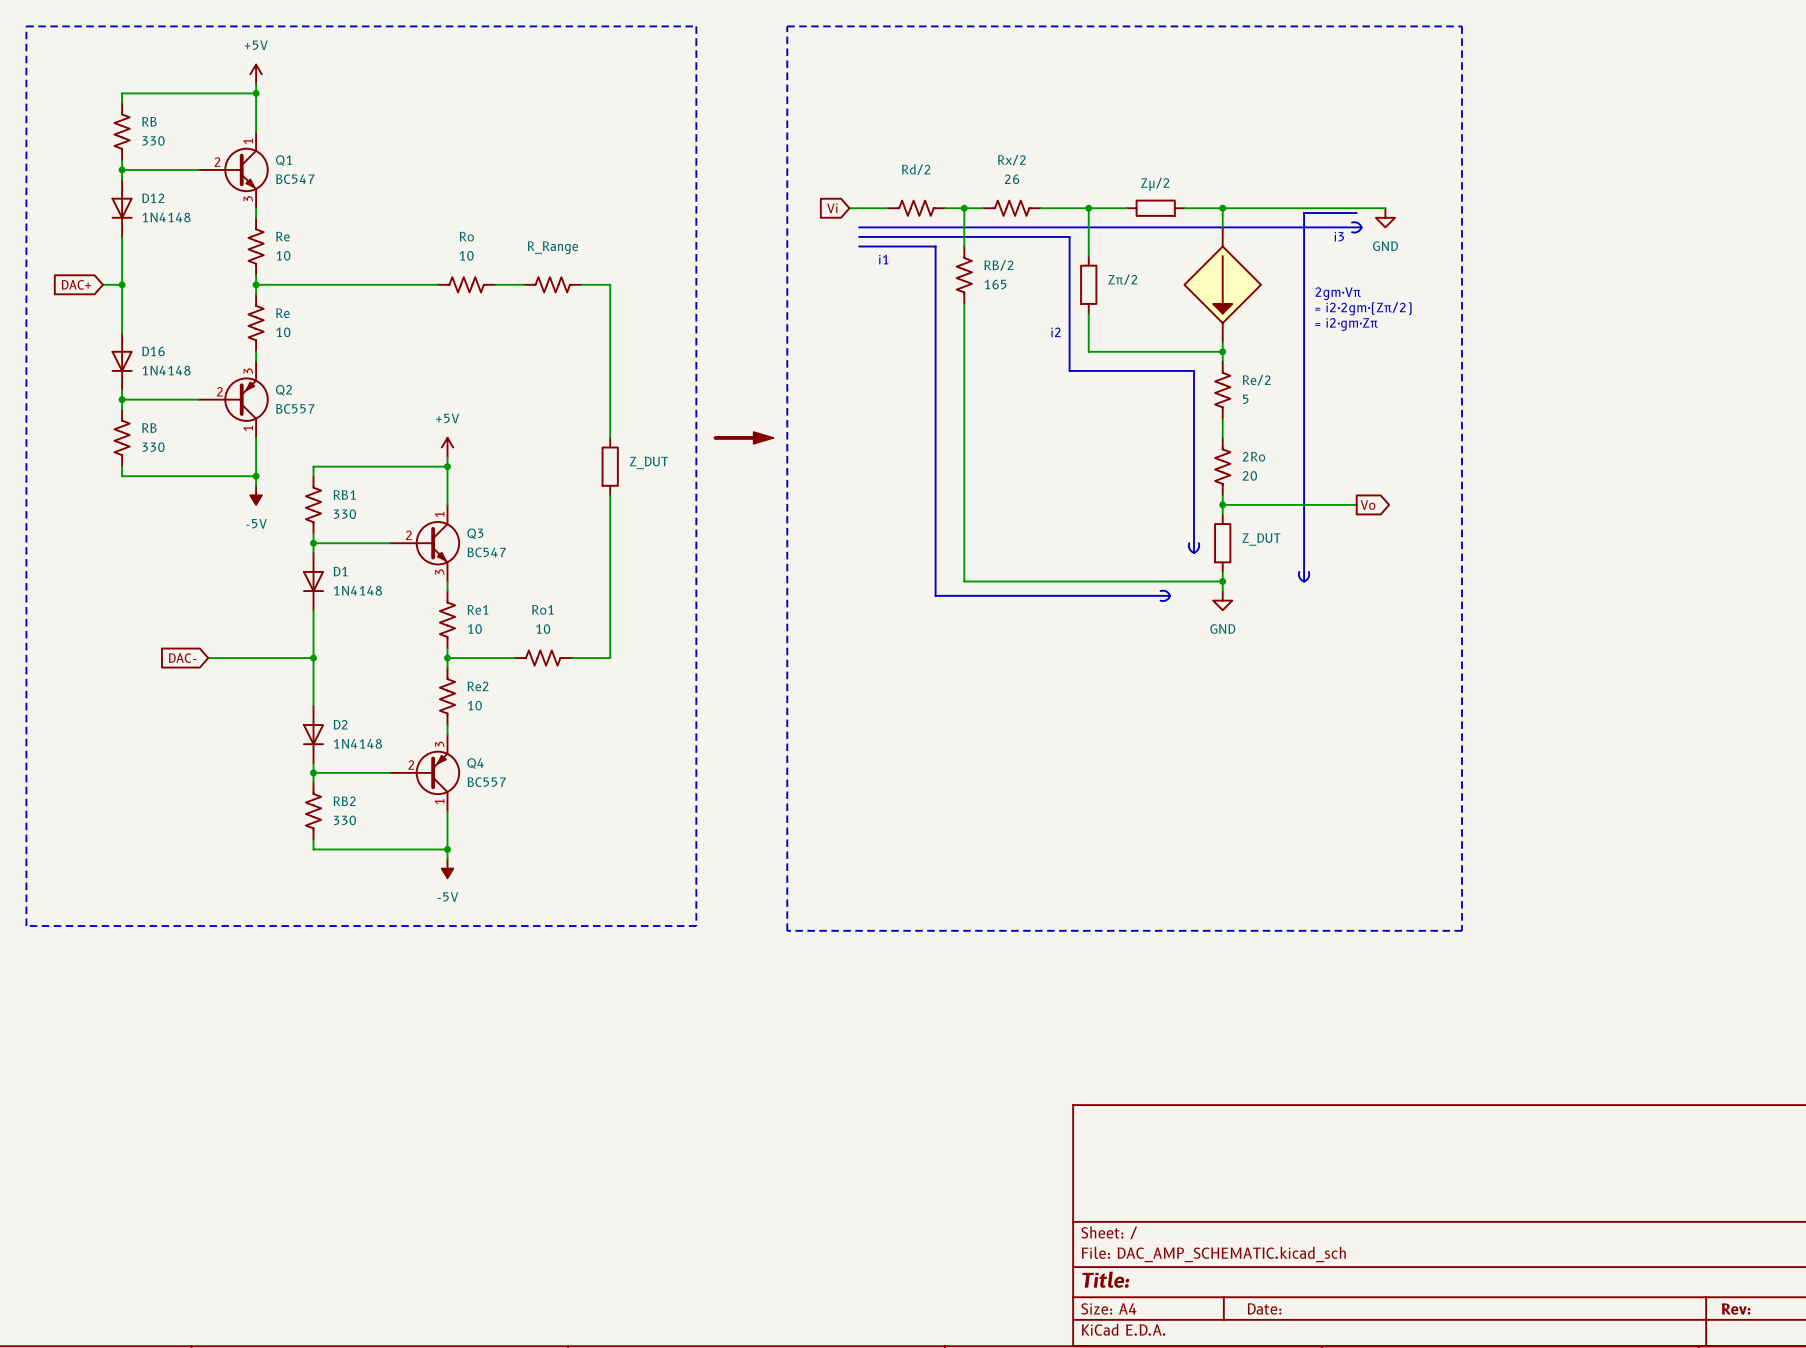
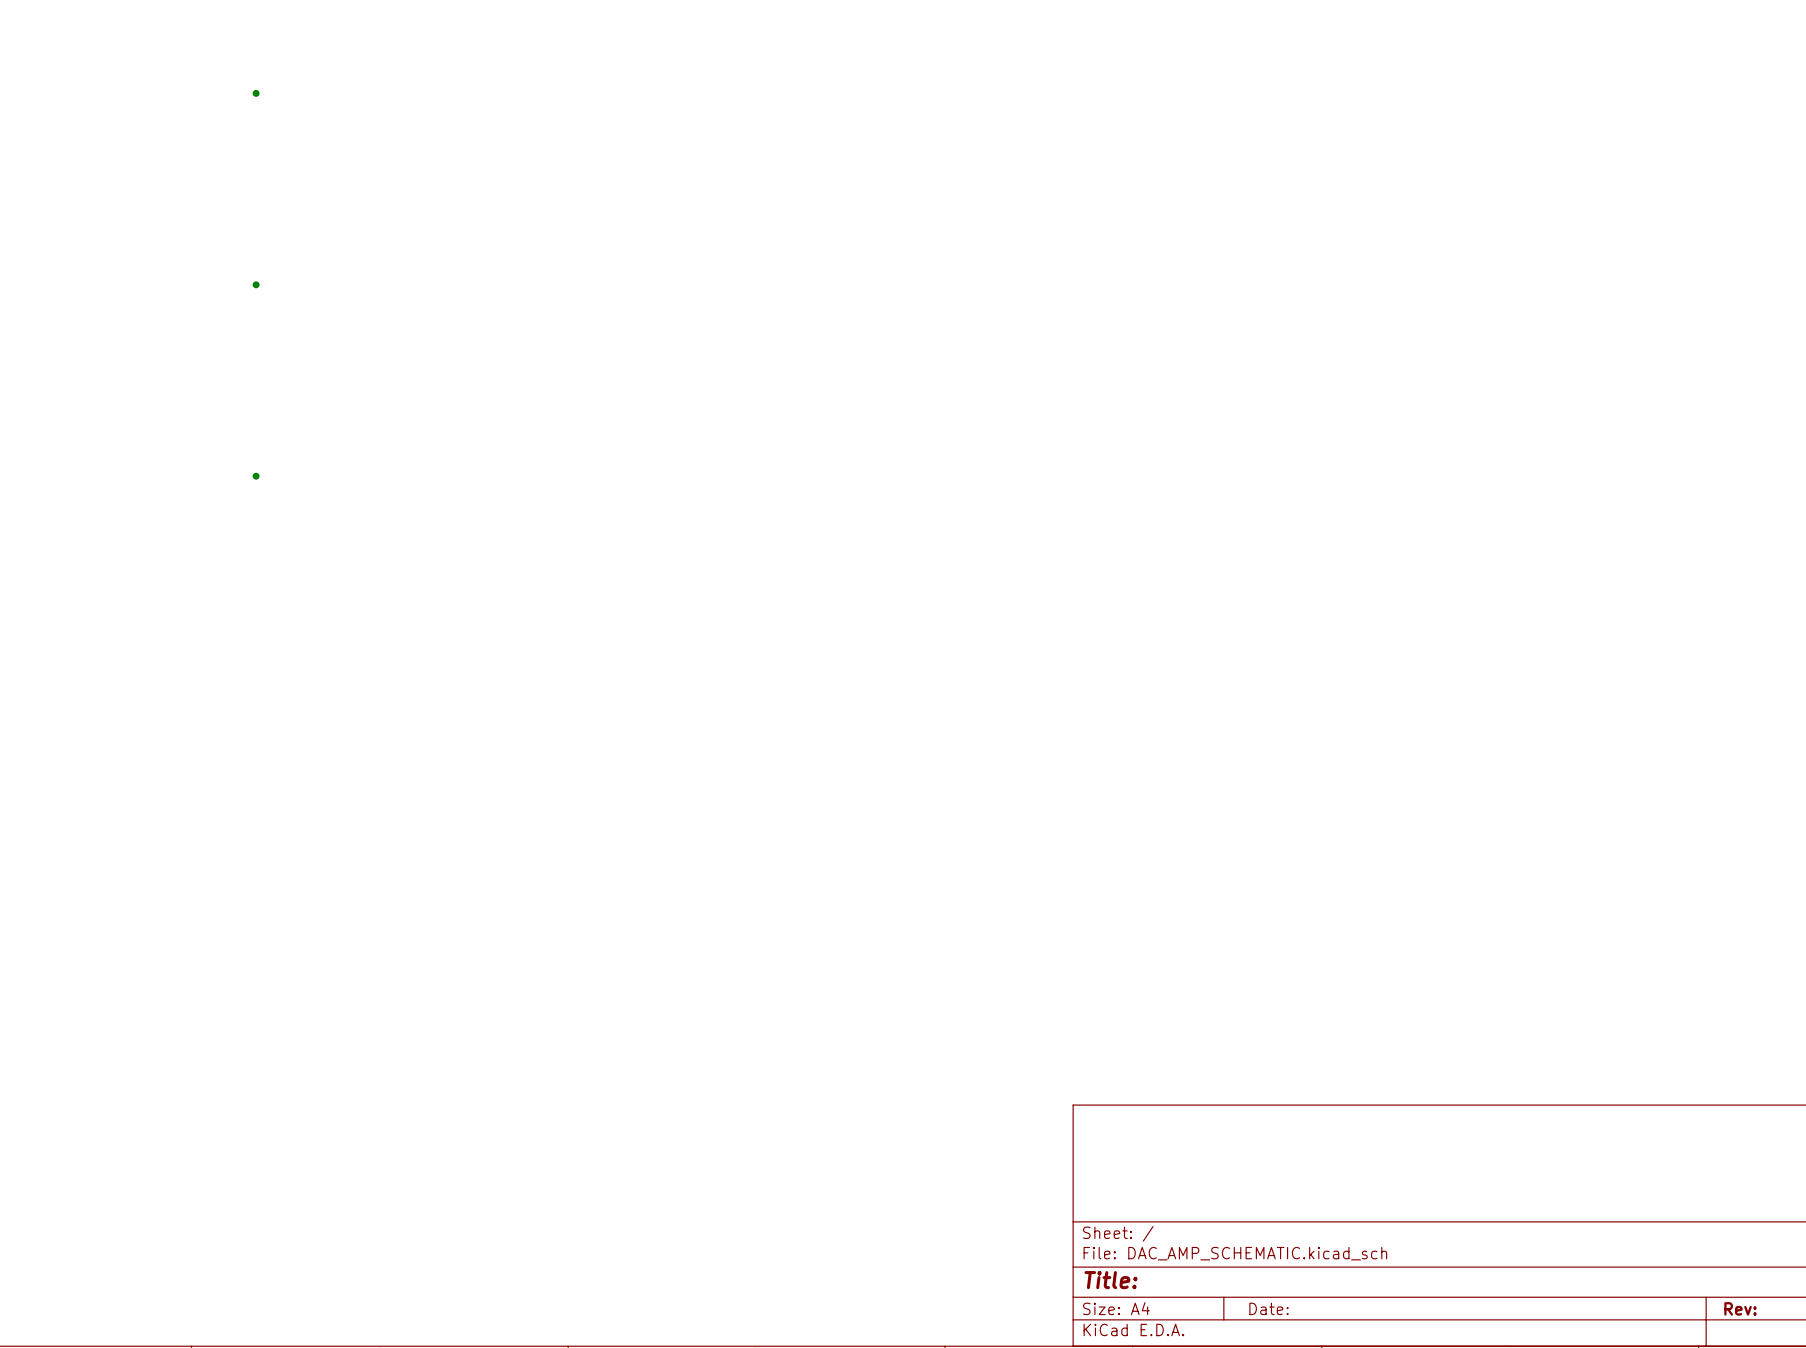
line: (26, 26) (696, 26) (696, 926) (26, 926) (26, 26) -> none
line: (787, 26) (1461, 26) (1461, 930) (787, 930) (787, 26) -> none
power symbol: +5V (256, 74) -> none
wire: (256, 83) (256, 131) -> none
wire: (256, 93) (122, 93) (122, 102) -> none
RB: 330 (122, 131) -> none
wire: (122, 160) (122, 179) -> none
wire: (122, 169) (198, 169) -> none
junction: (122, 169) -> none
Q1: BC547 (233, 169) -> none
D12: 1N4148 (122, 208) -> none
wire: (256, 208) (256, 217) -> none
global label: Vi (832, 208) -> none
wire: (849, 208) (887, 208) -> none
Rd/2: (916, 208) -> none
wire: (945, 208) (983, 208) -> none
wire: (964, 208) (964, 246) -> none
junction: (964, 208) -> none
Rx/2: 26 (1012, 208) -> none
wire: (1040, 208) (1127, 208) -> none
wire: (1088, 208) (1088, 256) -> none
junction: (1088, 208) -> none
Zμ/2: (1155, 208) -> none
wire: (1184, 208) (1385, 208) -> none
wire: (1222, 208) (1222, 227) -> none
junction: (1222, 208) -> none
line: (1356, 213) (1304, 213) (1304, 581) -> none
power symbol: GND (1385, 217) -> none
line: (1351, 222) (1357, 223) (1361, 227) -> none
line: (859, 227) (1361, 227) -> none
line: (1361, 227) (1357, 231) (1351, 232) -> none
wire: (122, 236) (122, 332) -> none
line: (859, 236) (1069, 236) (1069, 370) (1194, 370) (1194, 552) -> none
text: i3 (1339, 236) -> none
Re: 10 (256, 246) -> none
line: (859, 246) (935, 246) (935, 595) (1170, 595) -> none
text: i1 (883, 259) -> none
wire: (256, 275) (256, 294) -> none
RB/2: 165 (964, 275) -> none
global label: DAC+ (76, 284) -> none
wire: (102, 284) (122, 284) -> none
junction: (122, 284) -> none
wire: (256, 284) (437, 284) -> none
Ro: 10 (466, 284) -> none
wire: (495, 284) (524, 284) -> none
R_Range: (552, 284) -> none
wire: (581, 284) (610, 284) (610, 437) -> none
Zπ/2: (1088, 284) -> none
part: (1222, 284) -> none
text: 2gm·Vπ (1338, 293) -> none
wire: (964, 303) (964, 581) (1222, 581) -> none
text: = i2·2gm·(Zπ/2) (1363, 308) -> none
wire: (1088, 313) (1088, 351) (1222, 351) -> none
Re: 10 (256, 323) -> none
text: = i2·gm·Zπ (1346, 324) -> none
text: i2 (1056, 332) -> none
wire: (1222, 342) (1222, 361) -> none
wire: (256, 351) (256, 361) -> none
junction: (1222, 351) -> none
D16: 1N4148 (122, 361) -> none
wire: (122, 390) (122, 409) -> none
Re/2: 5 (1222, 390) -> none
wire: (122, 399) (198, 399) -> none
junction: (122, 399) -> none
Q2: BC557 (233, 399) -> none
wire: (1222, 418) (1222, 437) -> none
RB: 330 (122, 437) -> none
wire: (256, 437) (256, 485) -> none
power symbol: (743, 437) -> none
power symbol: +5V (447, 447) -> none
wire: (447, 457) (447, 504) -> none
wire: (122, 466) (122, 476) (256, 476) -> none
wire: (447, 466) (313, 466) (313, 476) -> none
junction: (447, 466) -> none
Z_DUT: (610, 466) -> none
2Ro: 20 (1222, 466) -> none
power symbol: -5V (256, 495) -> none
wire: (610, 495) (610, 658) (571, 658) -> none
wire: (1222, 495) (1222, 514) -> none
RB1: 330 (313, 504) -> none
wire: (1222, 504) (1356, 504) -> none
junction: (1222, 504) -> none
global label: Vo (1368, 504) -> none
wire: (313, 533) (313, 552) -> none
wire: (313, 543) (390, 543) -> none
junction: (313, 543) -> none
Q3: BC547 (425, 543) -> none
line: (1189, 543) (1189, 548) (1194, 552) -> none
line: (1198, 543) (1198, 548) (1194, 552) -> none
Z_DUT: (1222, 543) -> none
wire: (1222, 571) (1222, 591) -> none
line: (1299, 571) (1299, 577) (1304, 581) -> none
line: (1308, 571) (1308, 577) (1304, 581) -> none
D1: 1N4148 (313, 581) -> none
wire: (447, 581) (447, 591) -> none
junction: (1222, 581) -> none
line: (1160, 591) (1166, 591) (1170, 595) -> none
line: (1170, 595) (1166, 600) (1160, 600) -> none
power symbol: GND (1222, 600) -> none
wire: (313, 610) (313, 705) -> none
Re1: 10 (447, 619) -> none
wire: (447, 648) (447, 667) -> none
global label: DAC- (182, 658) -> none
wire: (208, 658) (313, 658) -> none
junction: (313, 658) -> none
wire: (447, 658) (514, 658) -> none
junction: (447, 658) -> none
Ro1: 10 (543, 658) -> none
Re2: 10 (447, 696) -> none
wire: (447, 725) (447, 734) -> none
D2: 1N4148 (313, 734) -> none
wire: (313, 763) (313, 782) -> none
wire: (313, 772) (390, 772) -> none
junction: (313, 772) -> none
Q4: BC557 (425, 772) -> none
RB2: 330 (313, 811) -> none
wire: (447, 811) (447, 859) -> none
wire: (313, 839) (313, 849) (447, 849) -> none
junction: (447, 849) -> none
power symbol: -5V (447, 868) -> none

